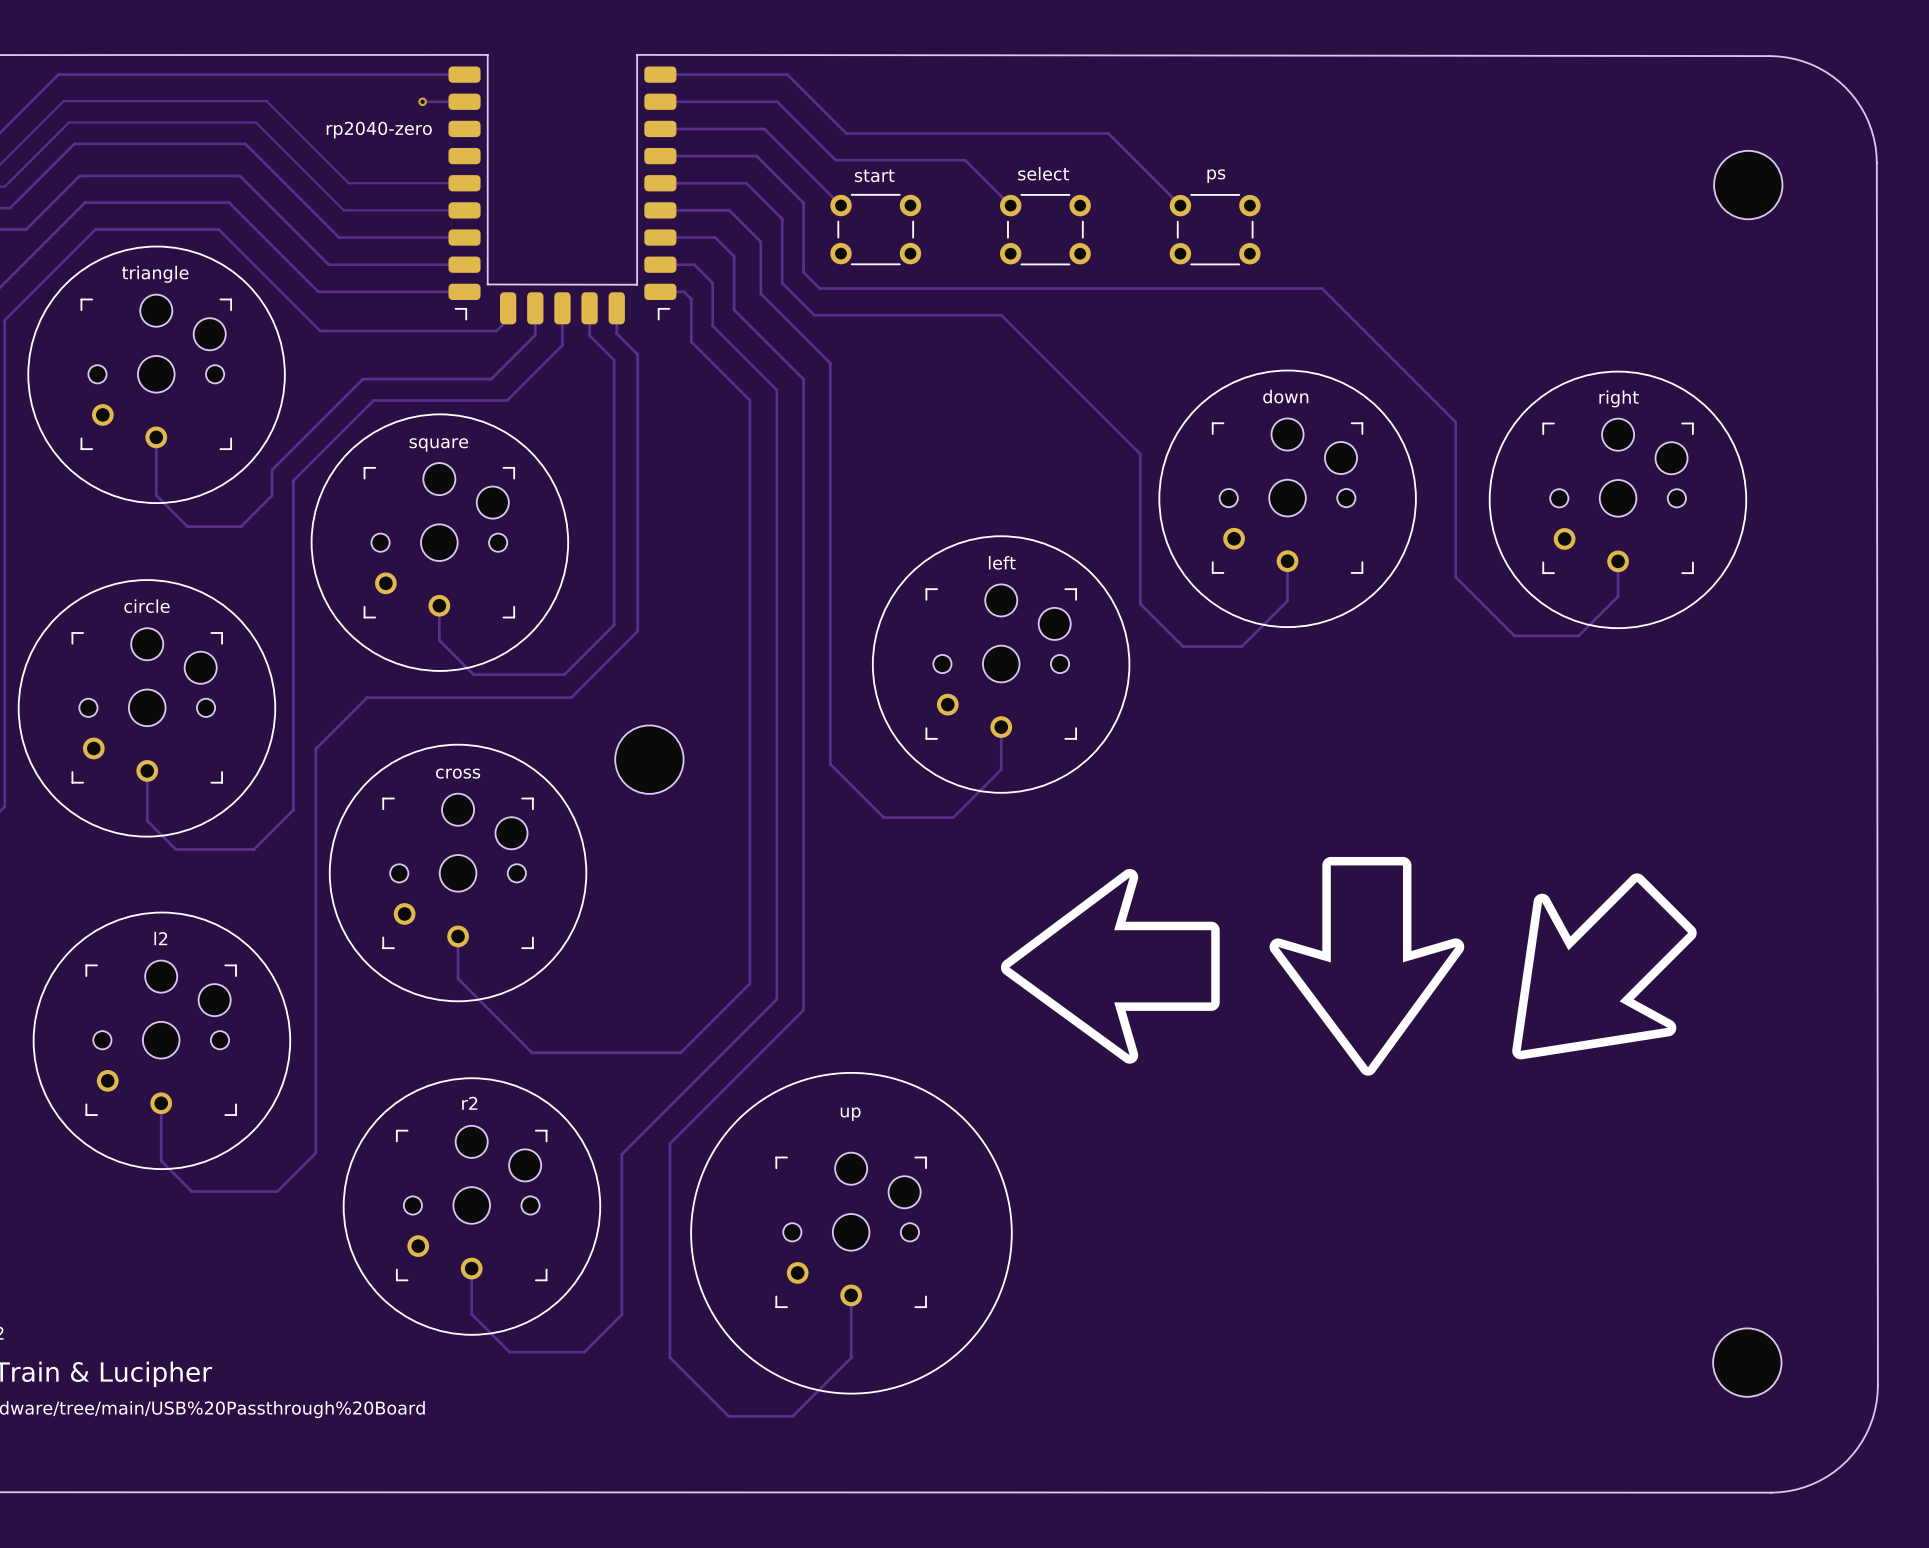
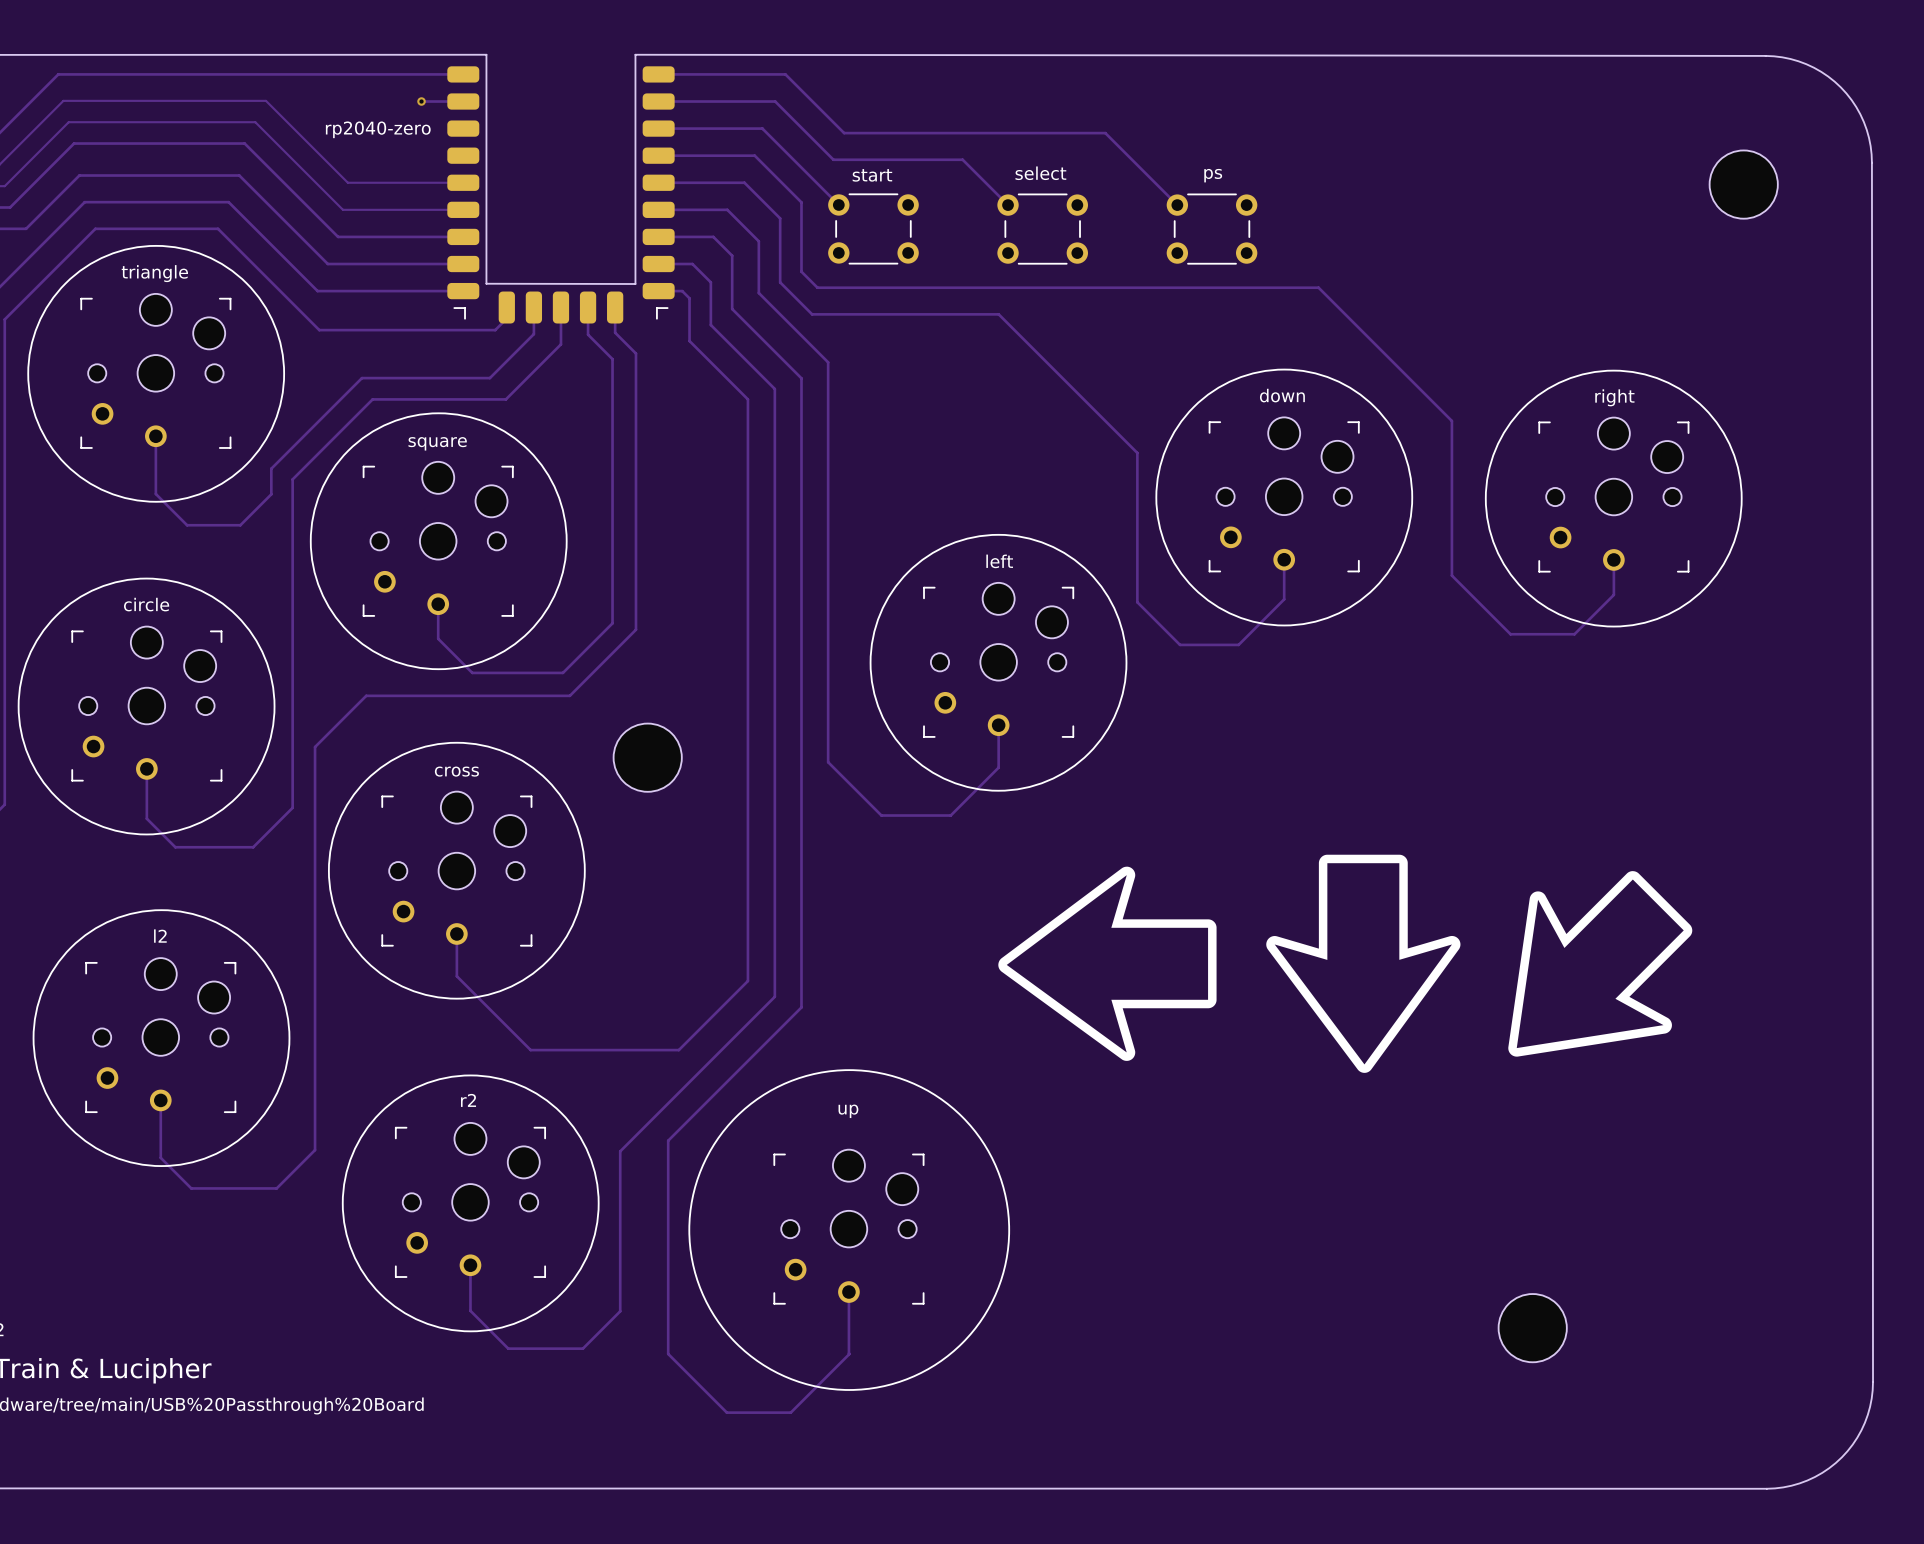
part position: (1747, 1362) -> (1532, 1328)

